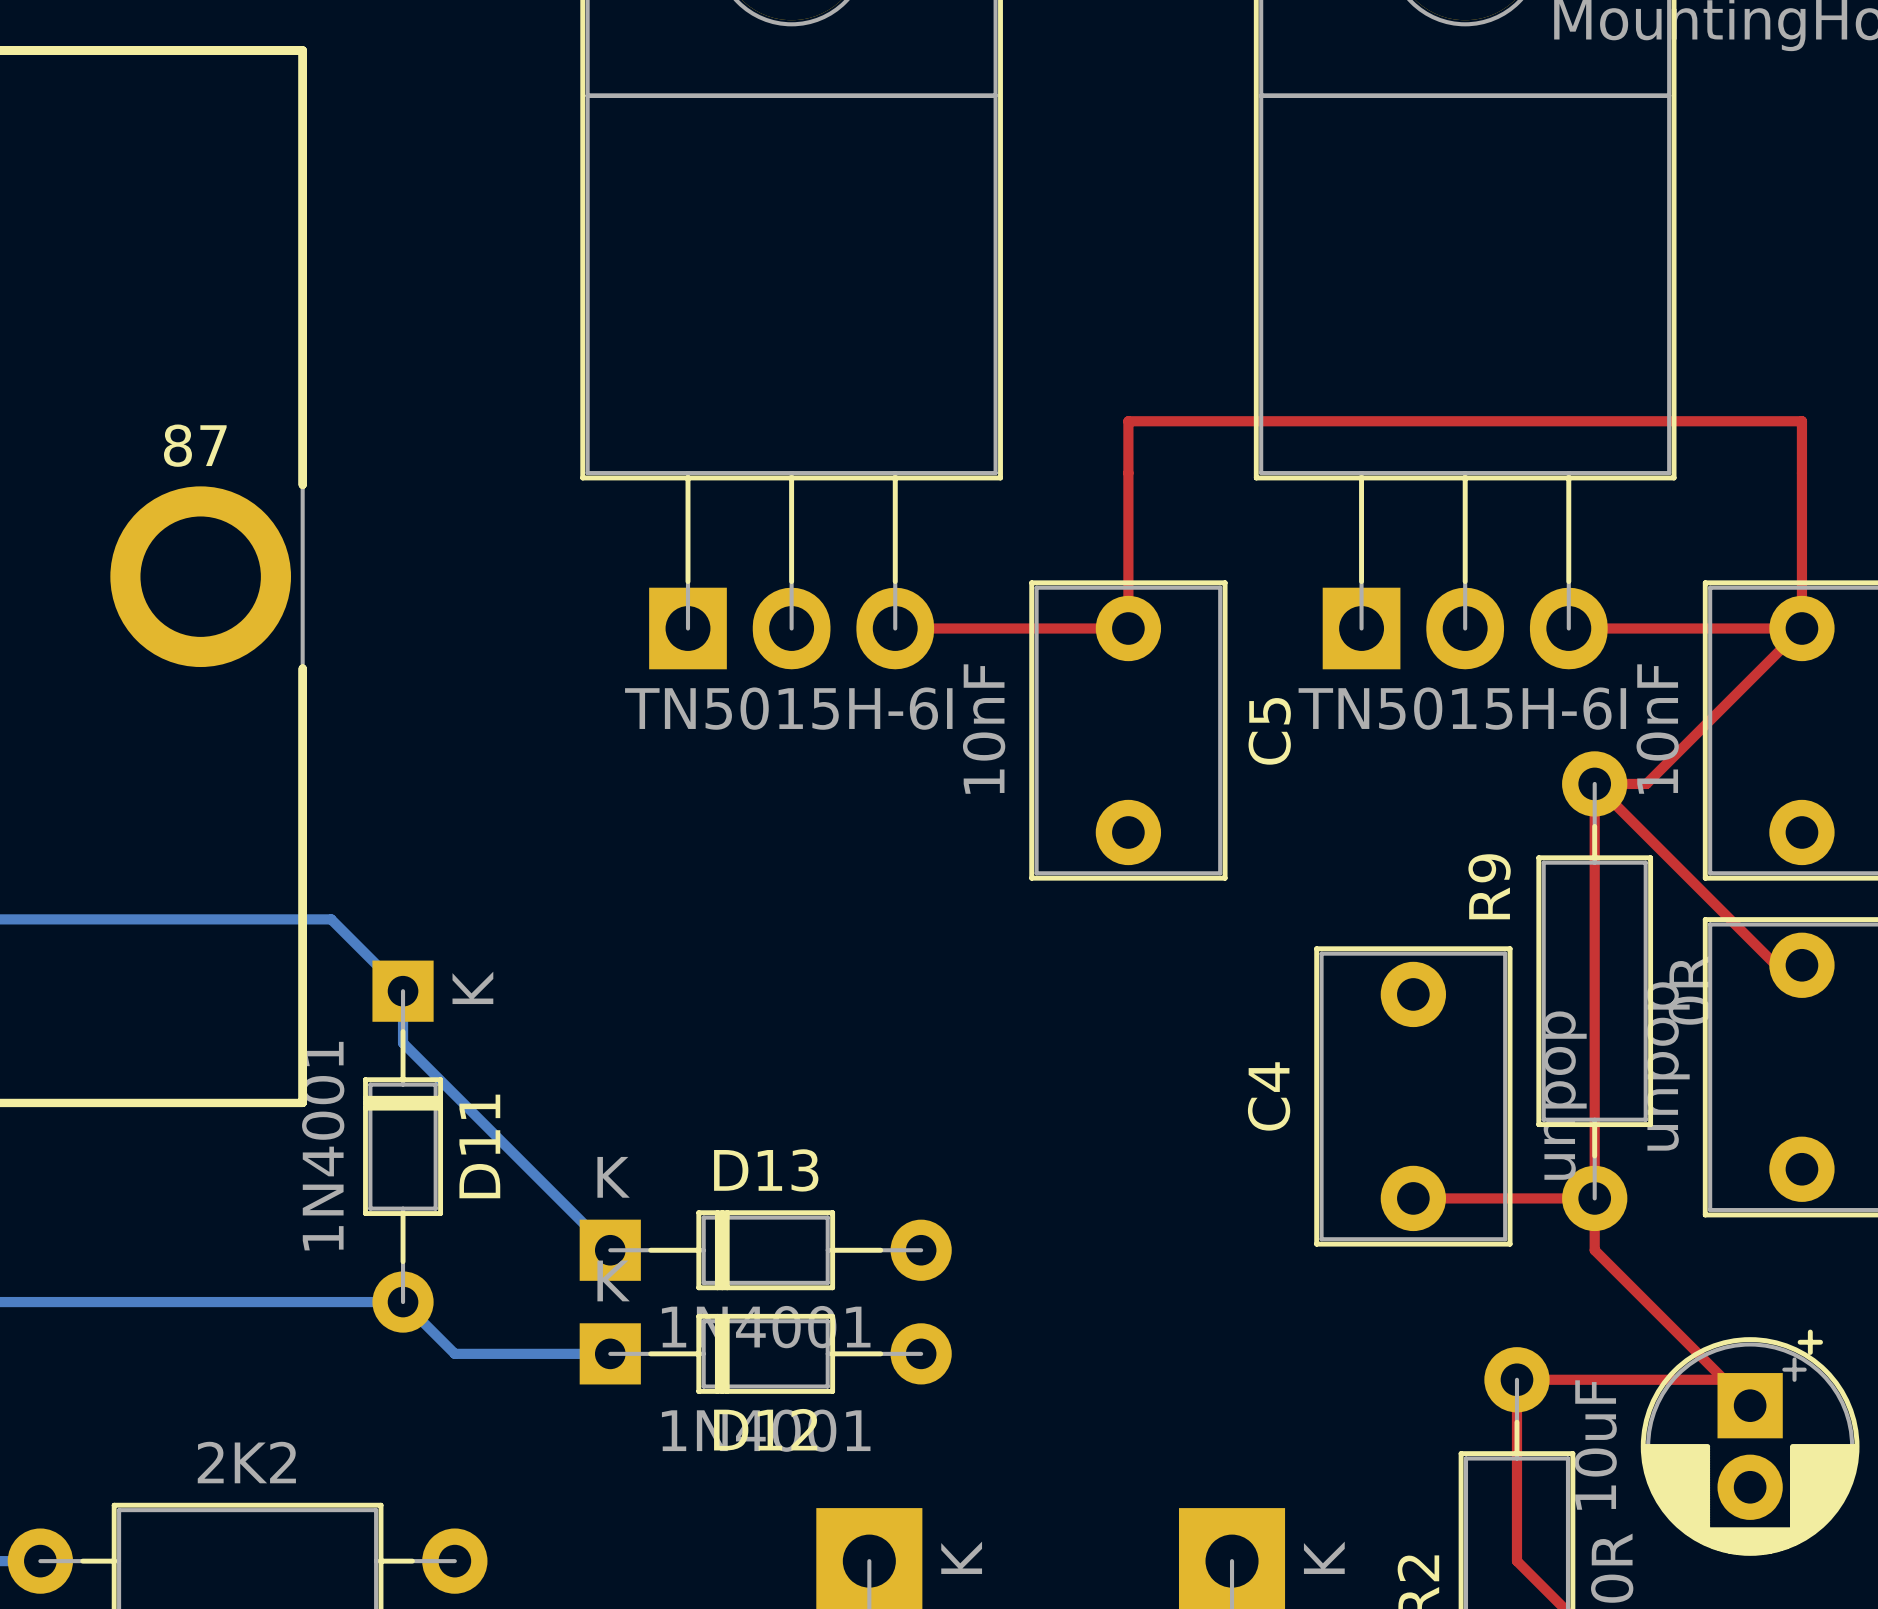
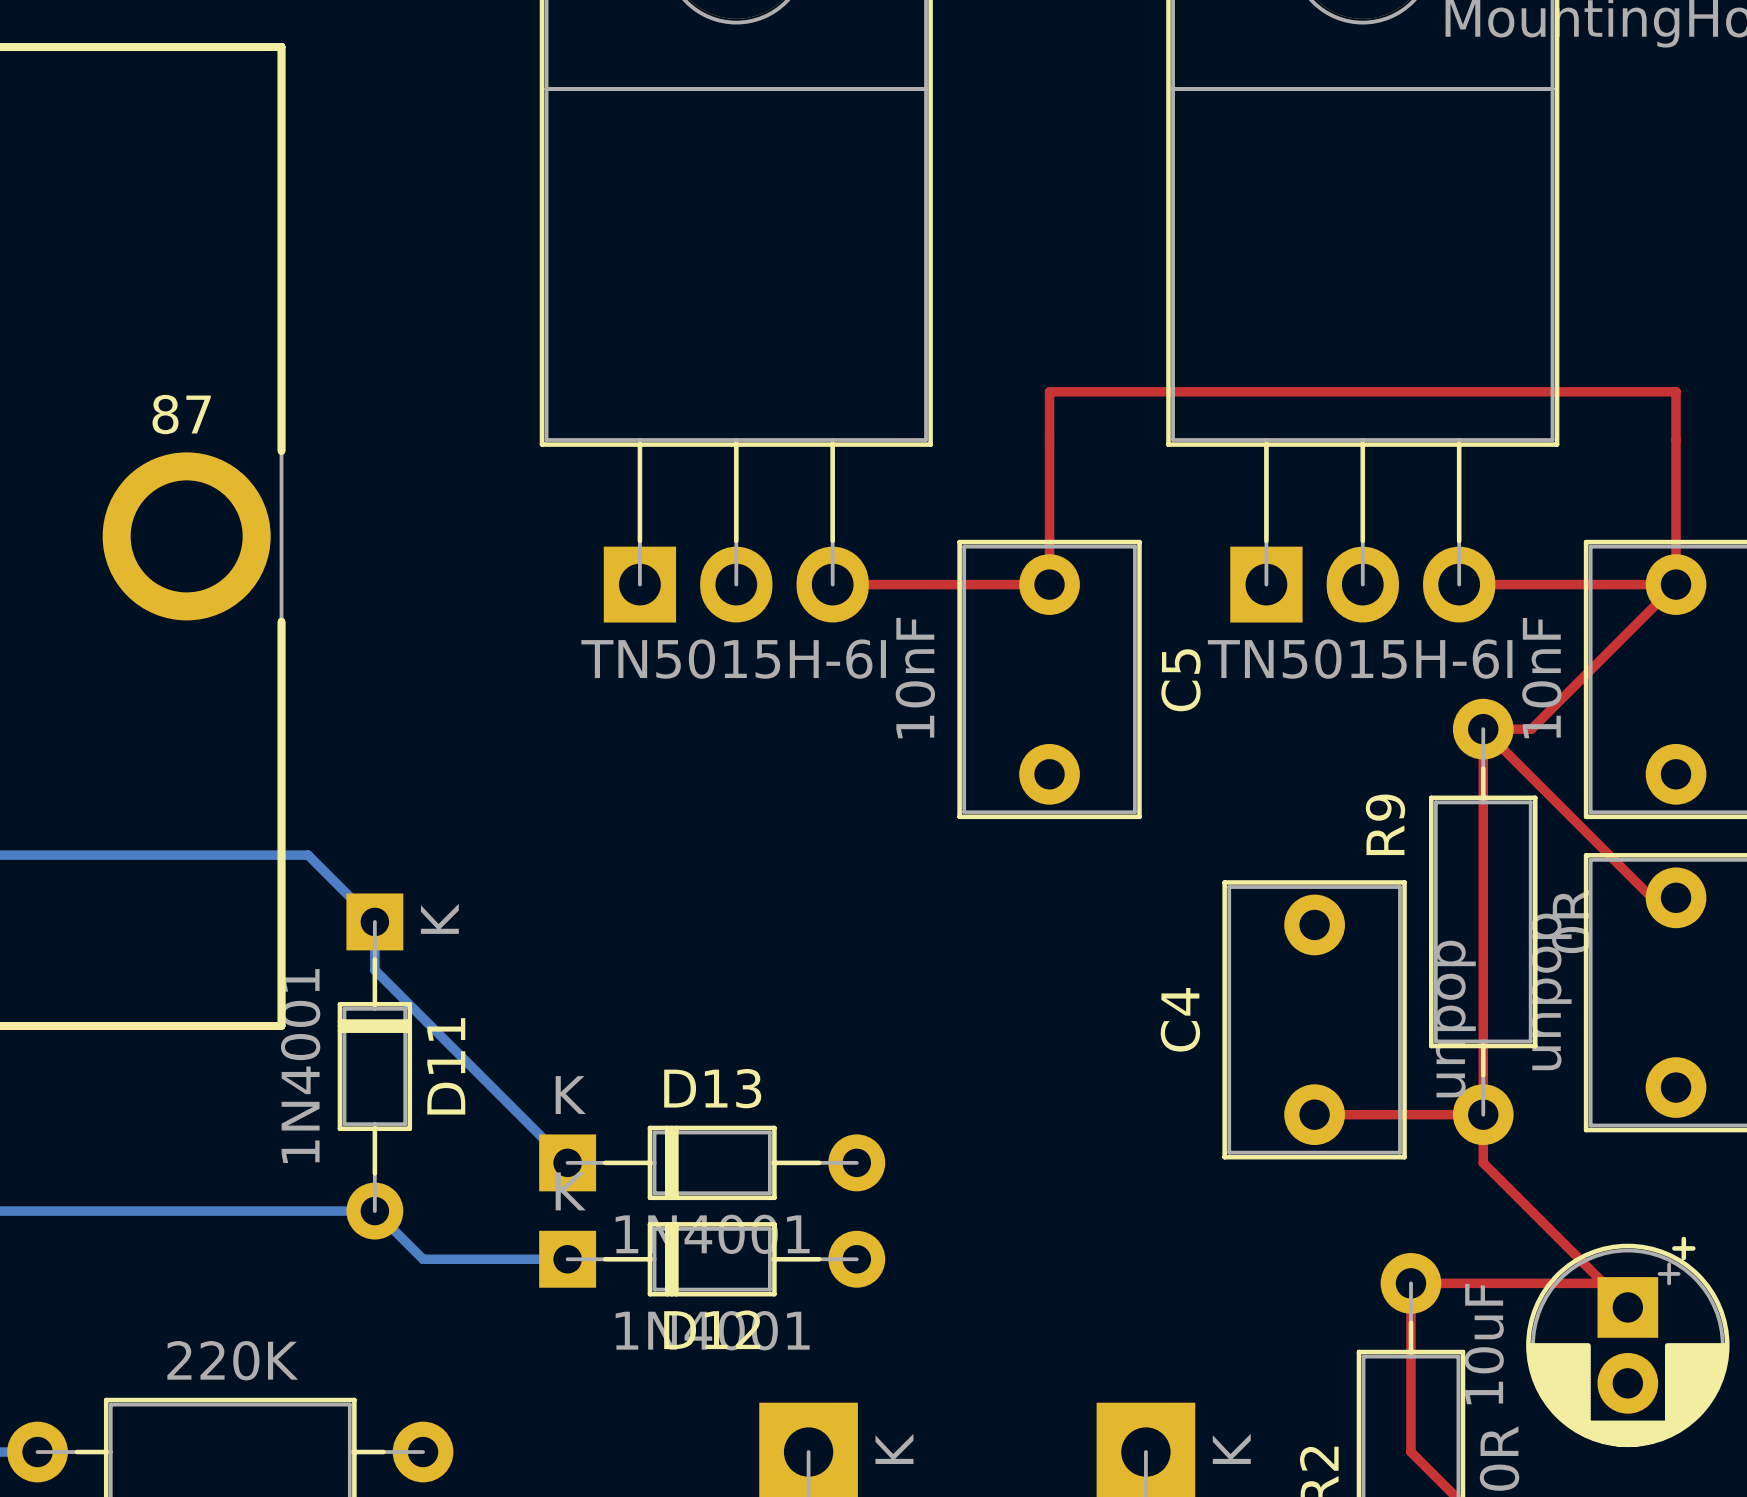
part value: 2K2 (246, 1462) -> 220K (232, 1360)

